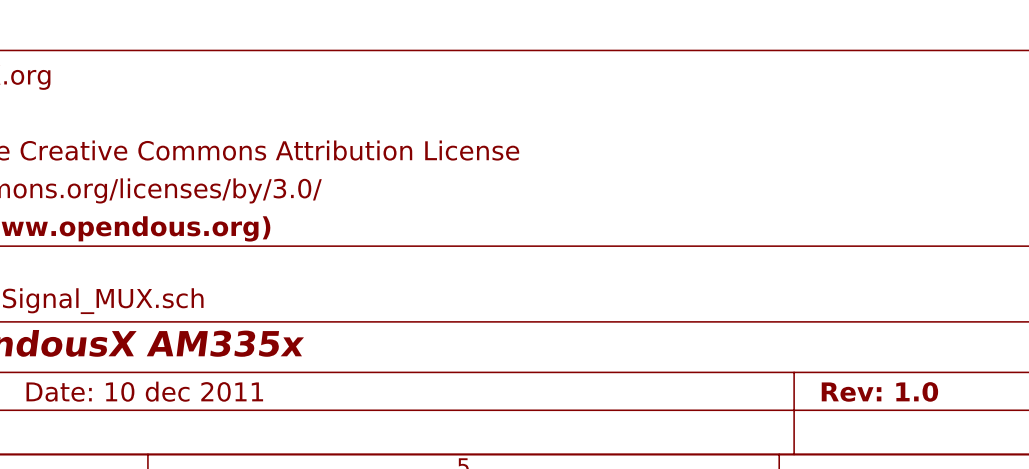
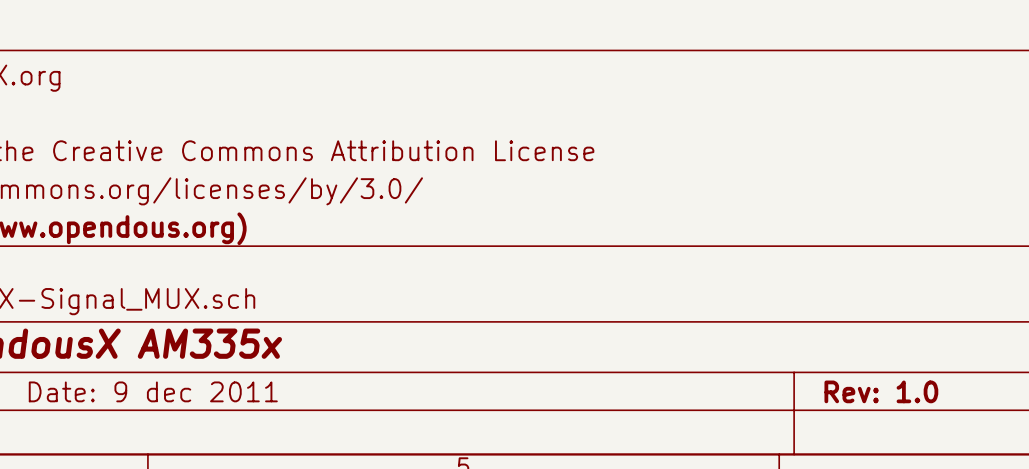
title block: Date: 10 dec 2011 (144, 391) -> Date: 9 dec 2011 (153, 391)

